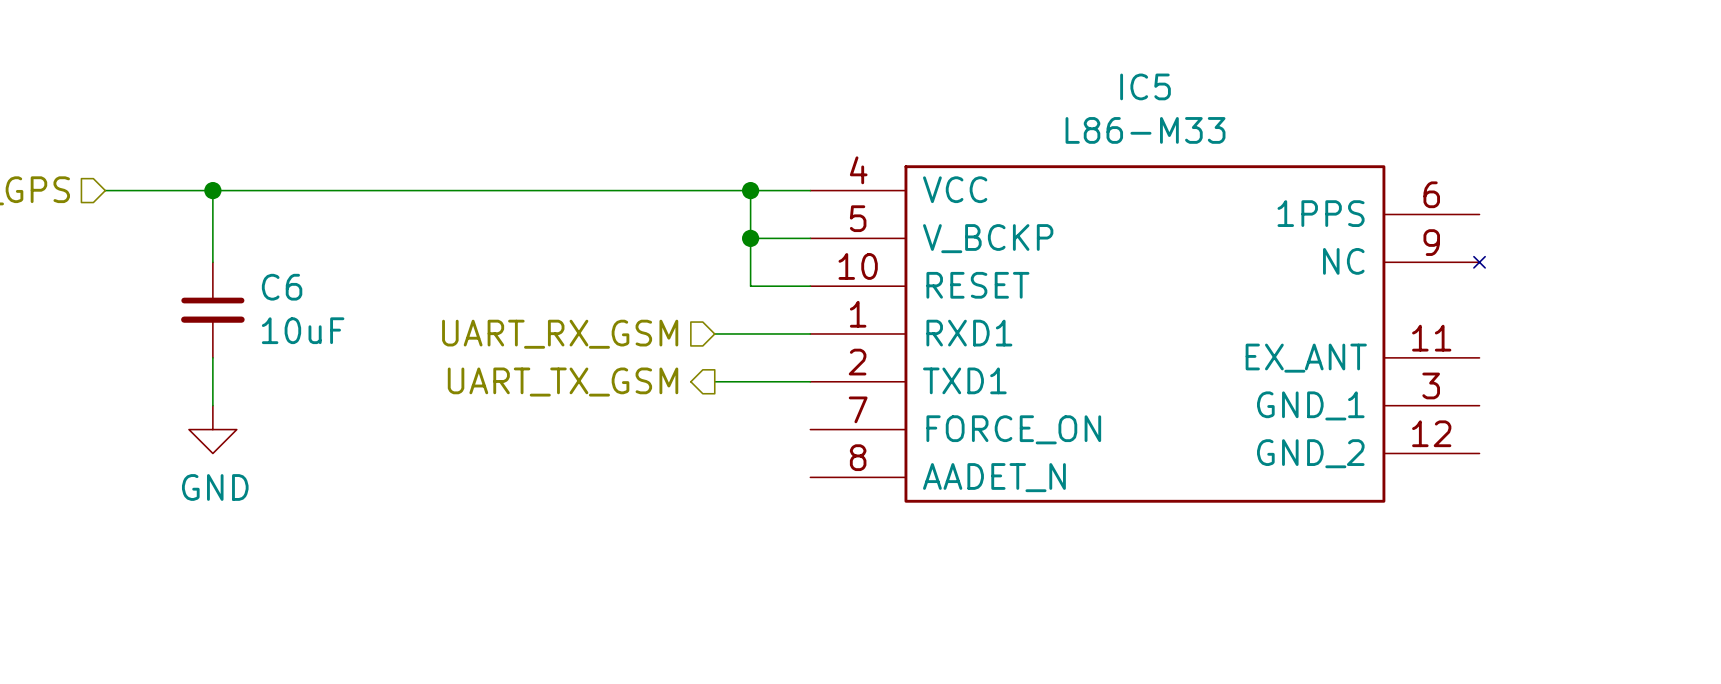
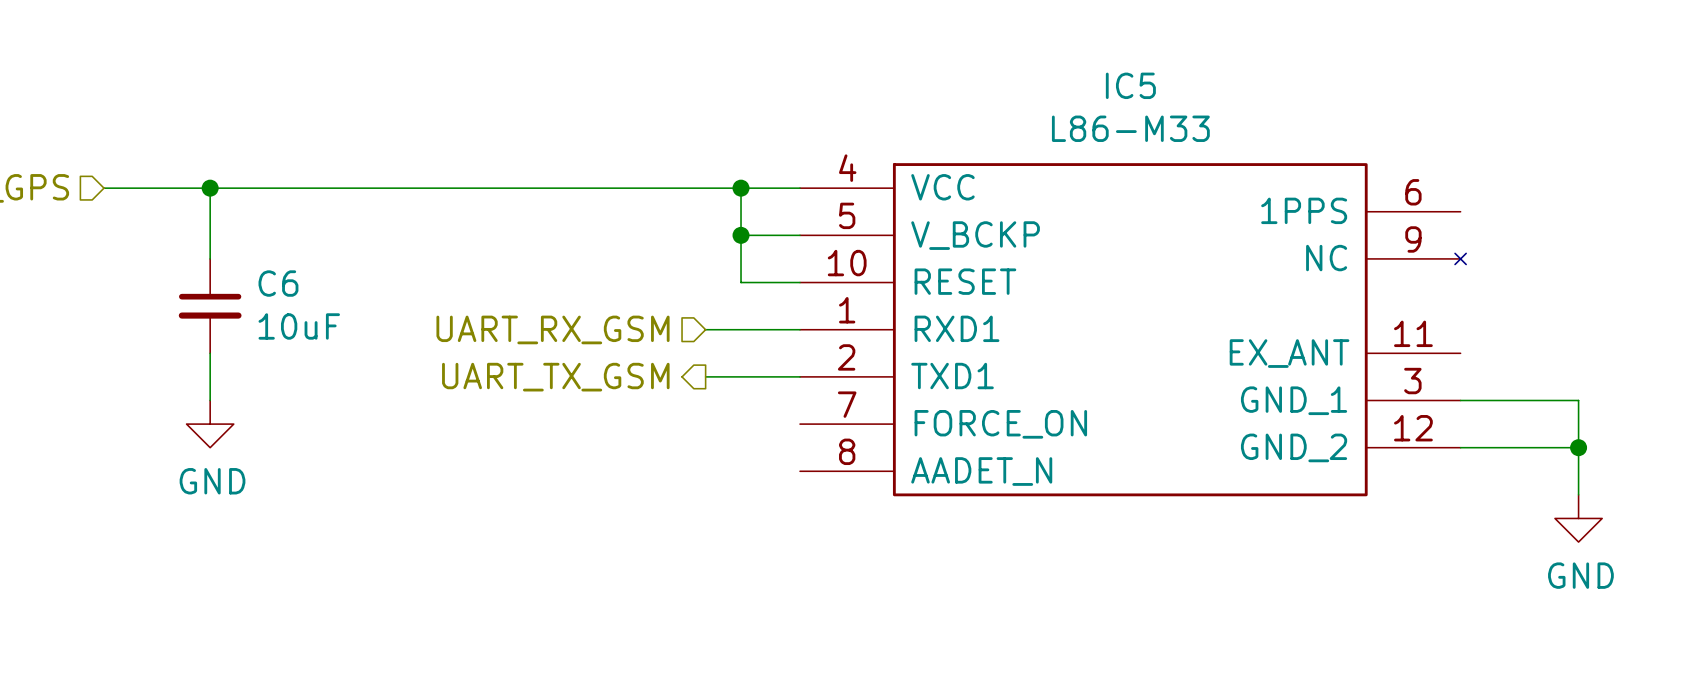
wire: none -> (1460, 400) (1578, 400) (1578, 494)
wire: none -> (1460, 447) (1578, 447)
junction: none -> (1578, 447)
power symbol: none -> GND (1578, 518)

